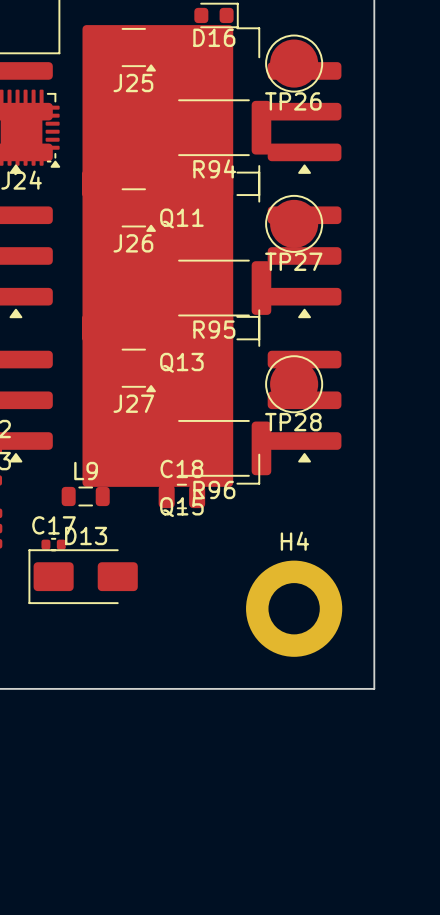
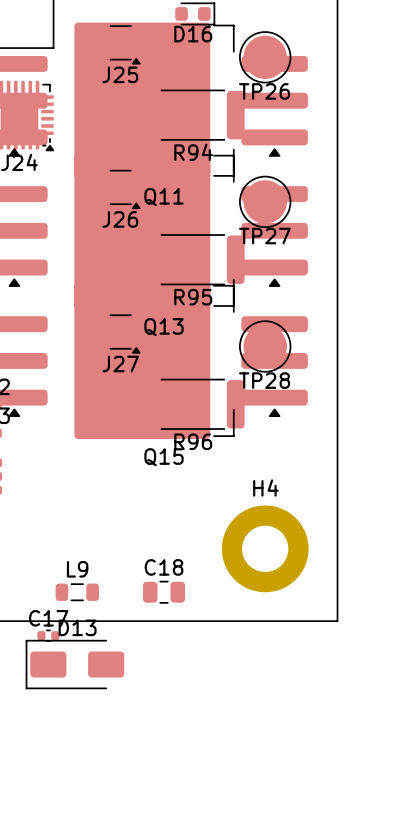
L9 position: (85, 496) -> (77, 592)
C18 position: (181, 496) -> (164, 592)
C17 position: (53, 544) -> (48, 635)
D13 position: (83, 576) -> (74, 664)

